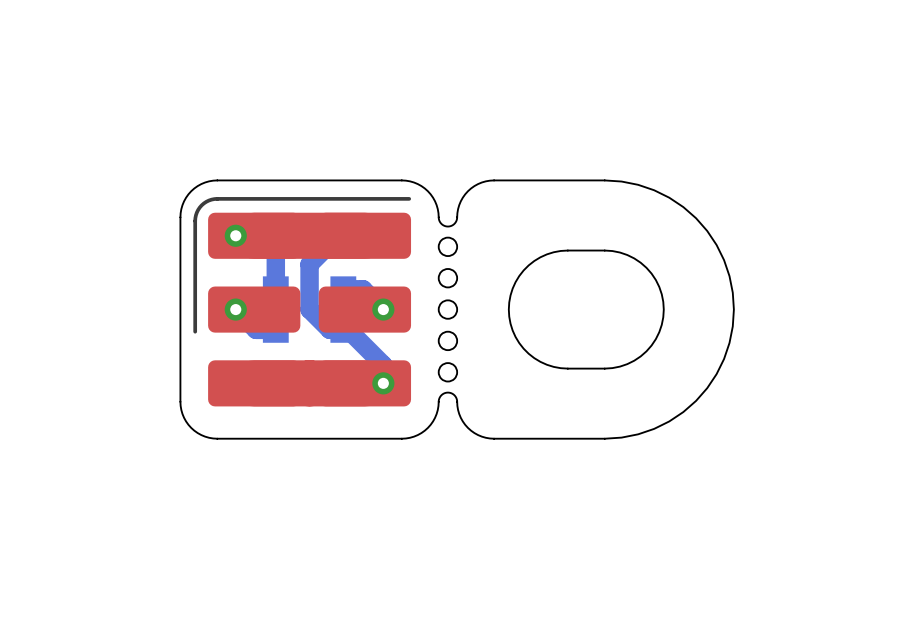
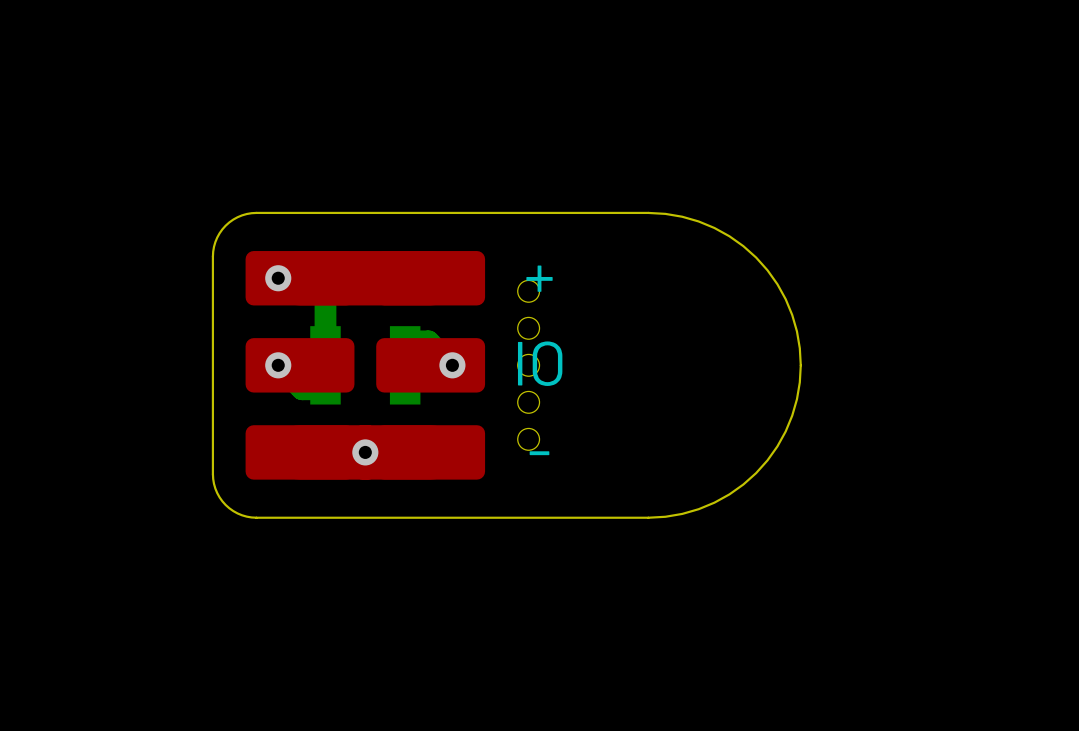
board edge: (401, 180) (414, 182) (427, 191) (436, 205) (439, 221) (447, 226) (455, 221) (459, 205) (467, 191) (478, 184) (494, 180) -> (474, 212) (583, 212)
board edge: (549, 180) (604, 180) (638, 184) (669, 197) (683, 207) (707, 230) (724, 260) (729, 276) (733, 309) (729, 342) (724, 358) (707, 388) (683, 412) (654, 428) (638, 434) (604, 438) (549, 438) -> (648, 212) (682, 216) (714, 228) (743, 246) (756, 257) (777, 284) (792, 314) (796, 331) (800, 365) (796, 399) (792, 415) (777, 446) (756, 473) (729, 494) (698, 509) (665, 516) (648, 517)
line: (409, 198) (217, 198) (206, 201) (199, 207) (195, 218) (195, 331) -> none
bottom track: (338, 235) (309, 264) (309, 309) (329, 329) (348, 329) (383, 364) (383, 383) -> none
text: none -> + (539, 278)
board edge: (567, 250) (620, 252) (640, 262) (655, 280) (663, 301) (661, 324) (651, 345) (634, 360) (612, 368) (553, 366) (540, 361) (528, 353) (515, 337) (510, 323) (508, 309) (512, 288) (519, 276) (528, 265) (540, 257) (553, 252) (567, 250) -> none
text: none -> IO (540, 363)
via position: (383, 383) -> (365, 452)
text: none -> - (539, 453)
board edge: (401, 438) (414, 436) (427, 427) (436, 414) (439, 397) (447, 392) (455, 397) (459, 414) (467, 427) (478, 435) (494, 438) -> (474, 517) (583, 517)

